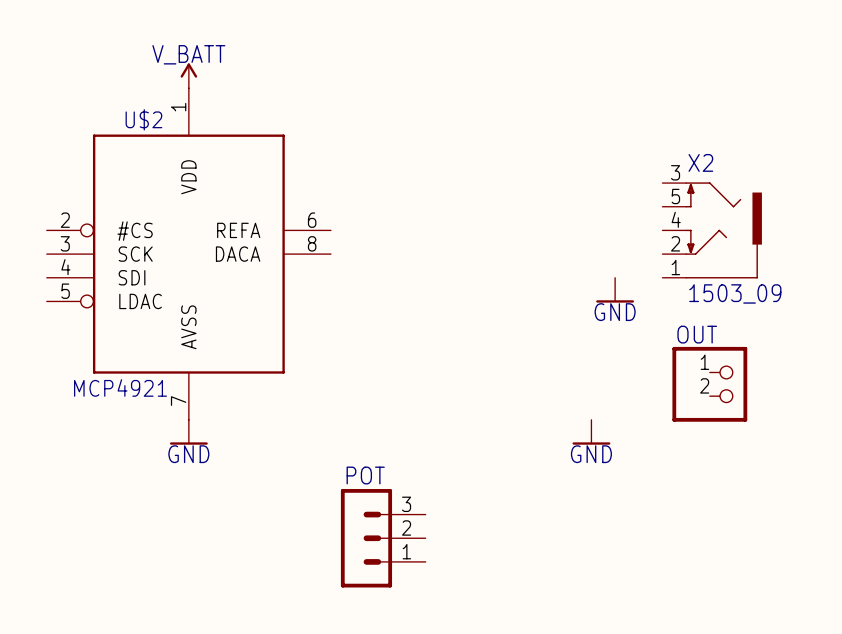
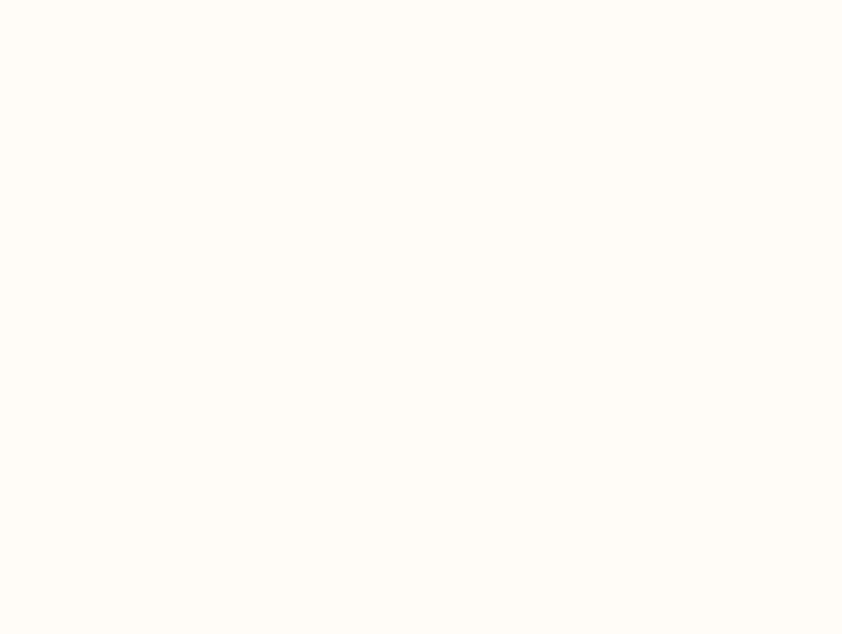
power symbol: V_BATT (188, 75) -> none
X2: 1503_09 (712, 230) -> none
U$2: (188, 254) -> none
power symbol: GND (615, 290) -> none
OUT: (709, 384) -> none
power symbol: GND (188, 432) -> none
power symbol: GND (591, 432) -> none
POT: (383, 538) -> none

